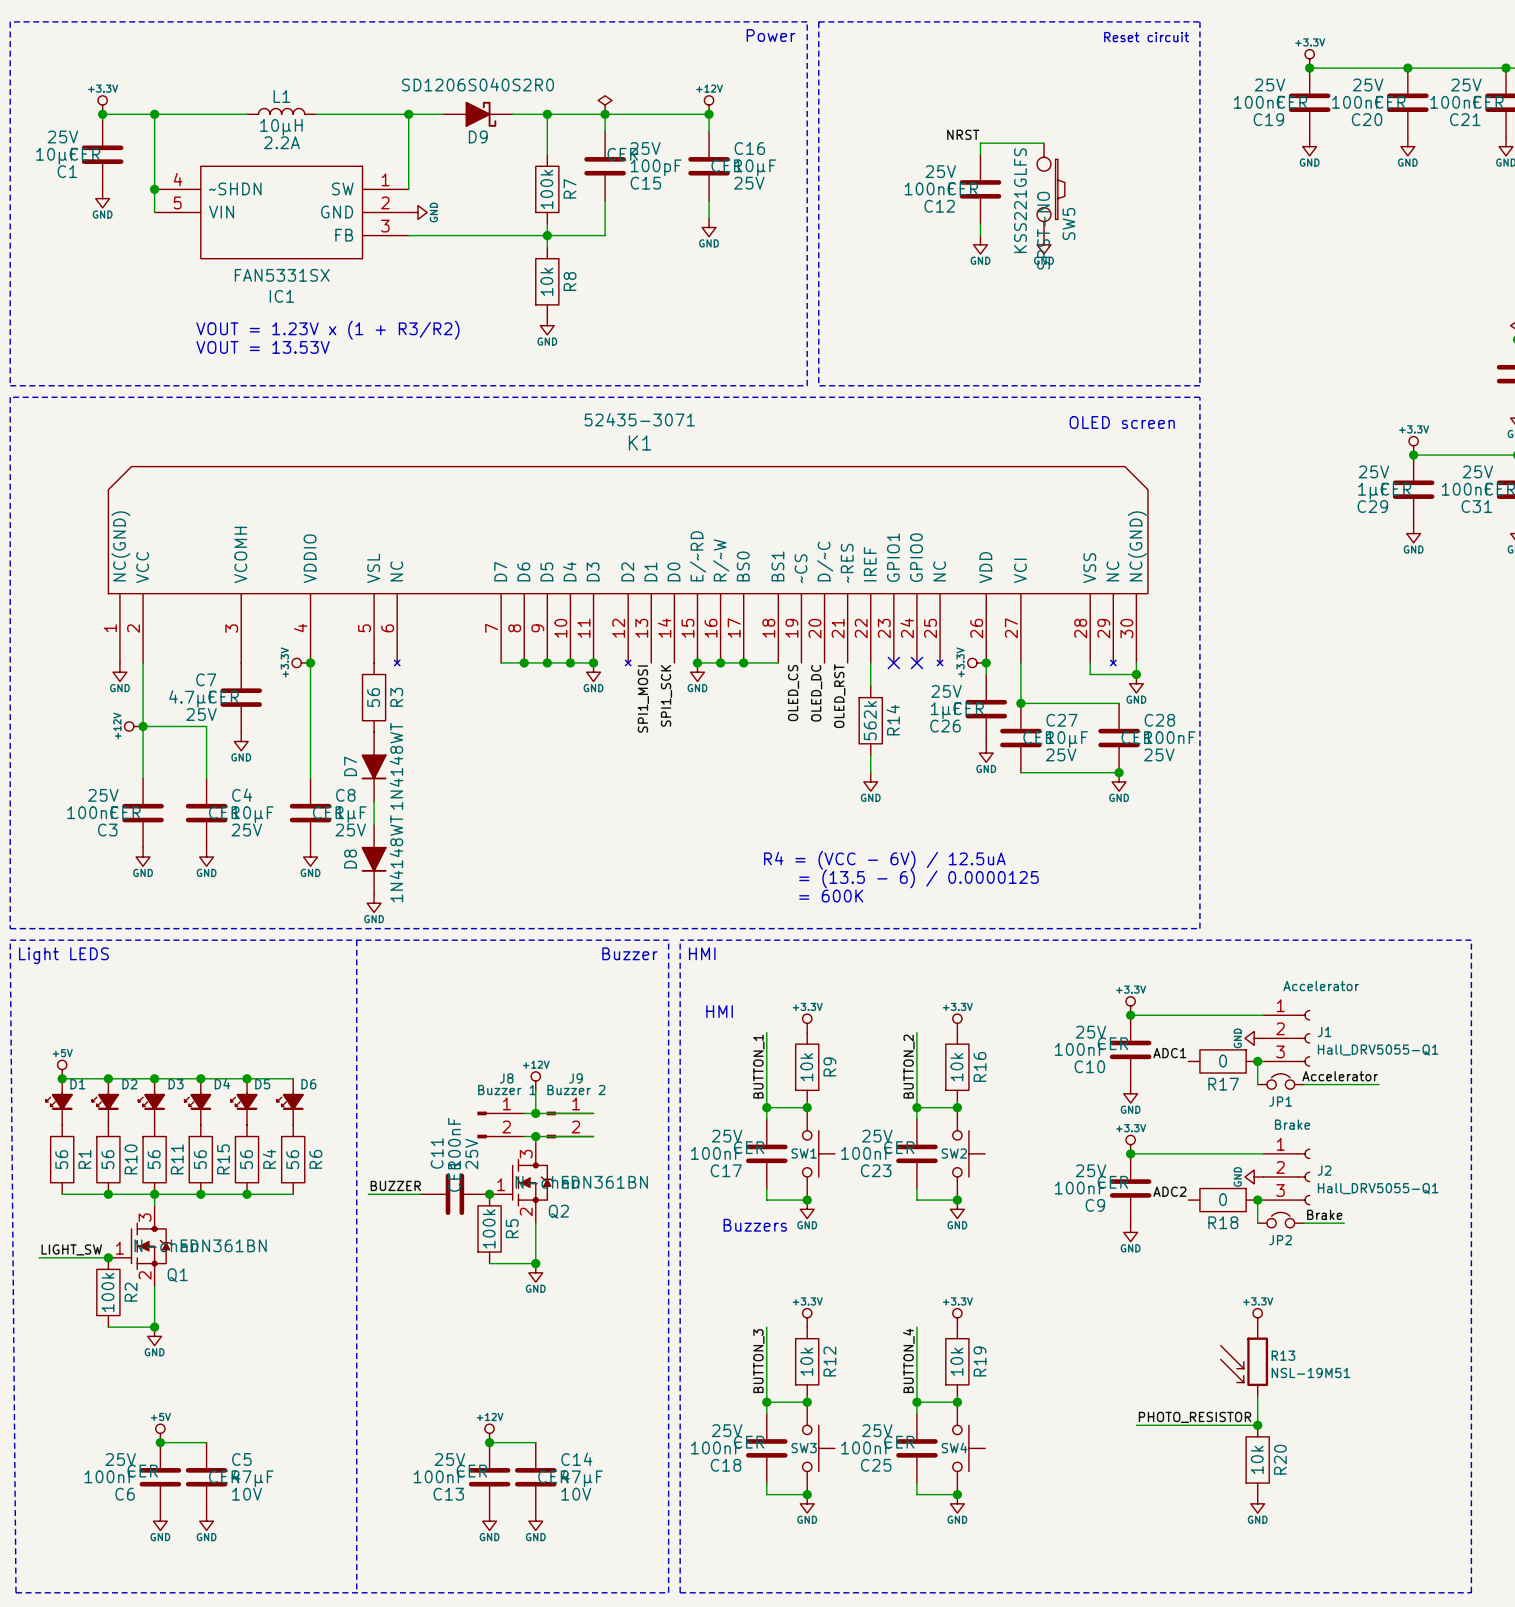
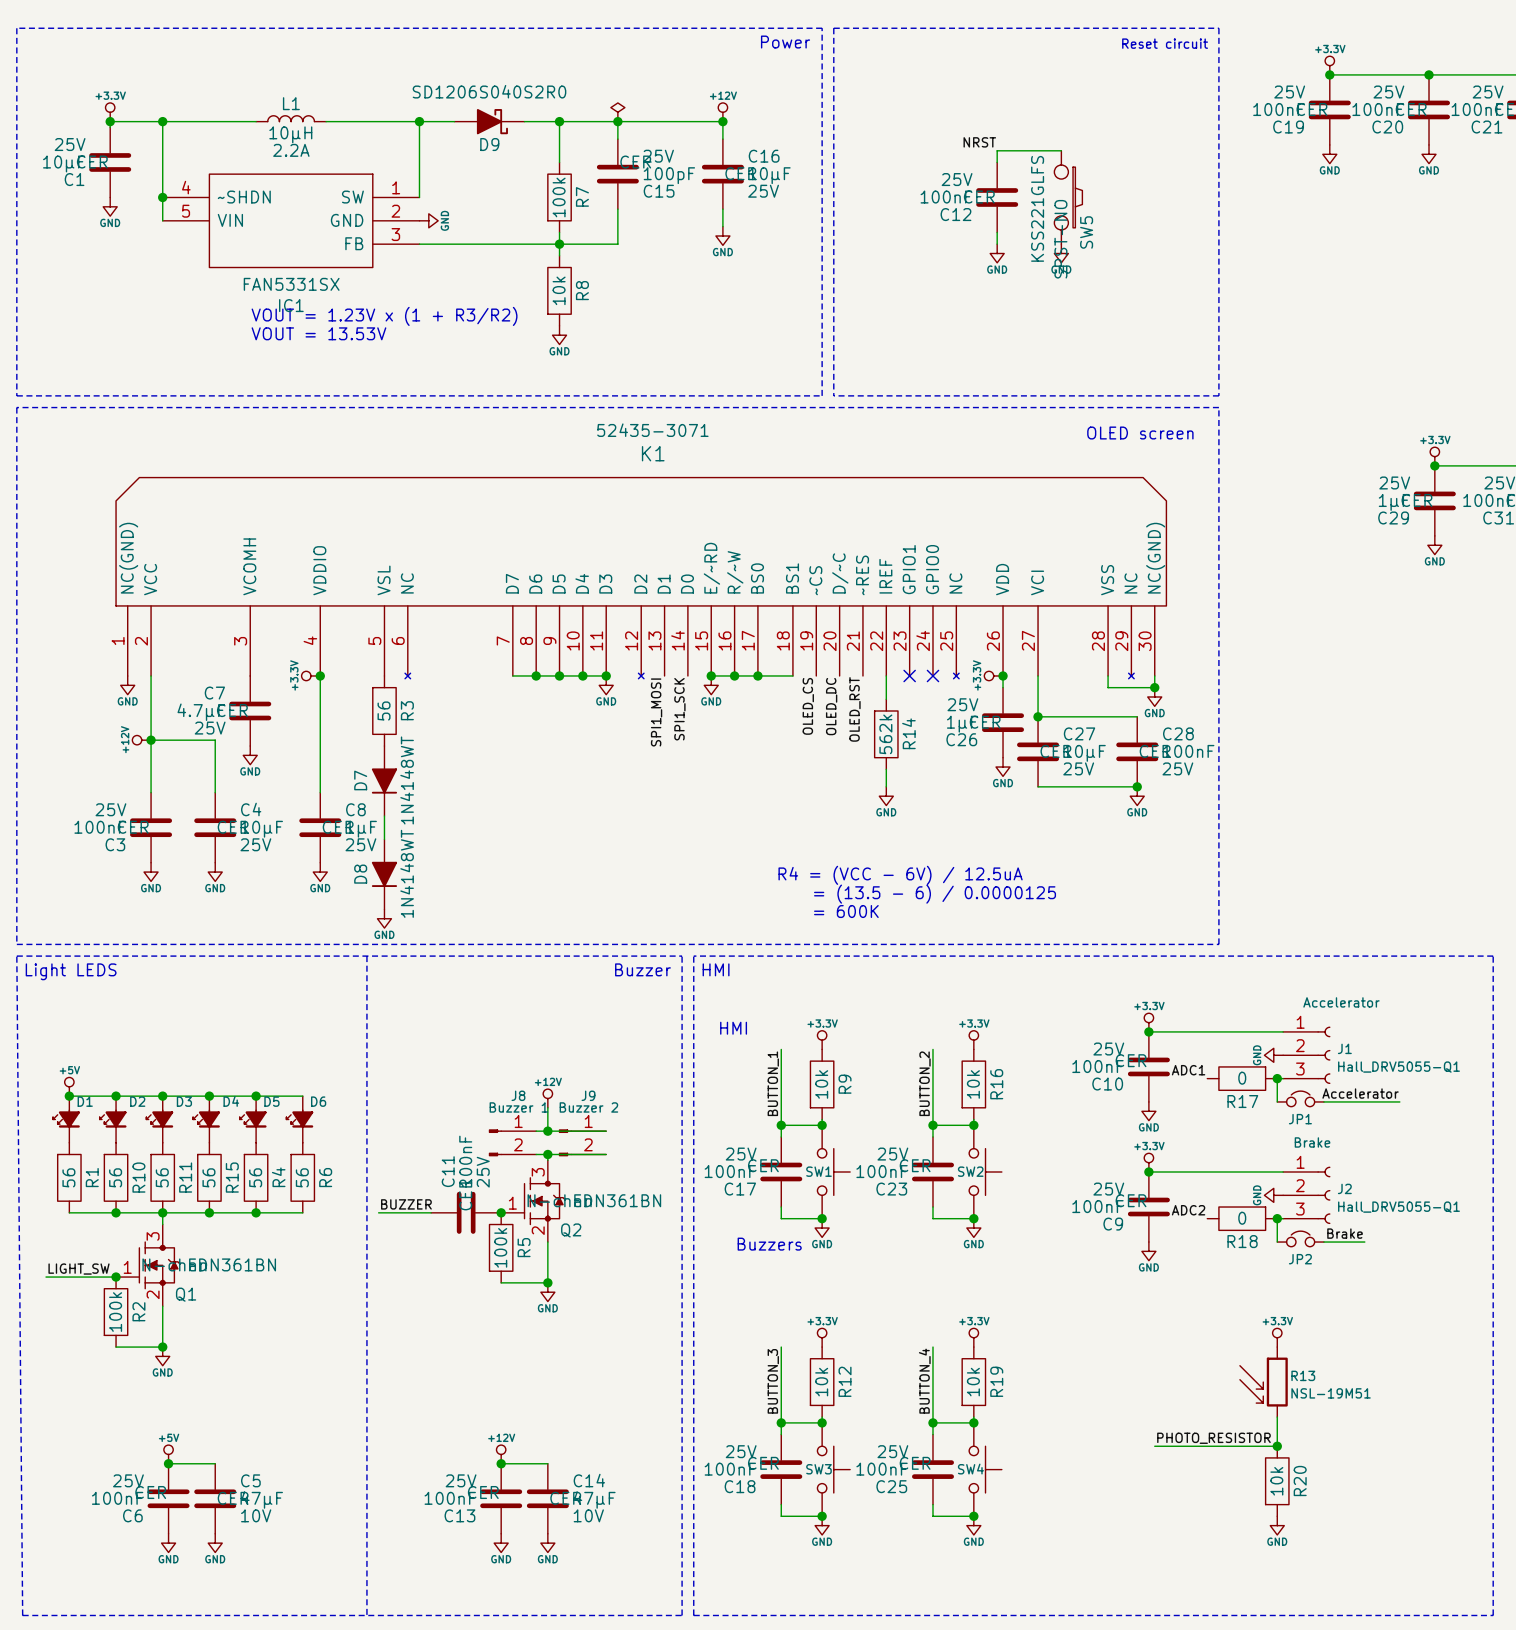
text position: VOUT = 1.23V x (1 + R3/R2) (327, 330) -> VOUT = 1.23V x (1 + R3/R2) (384, 316)
text position: VOUT = 13.53V (263, 347) -> VOUT = 13.53V (318, 333)

